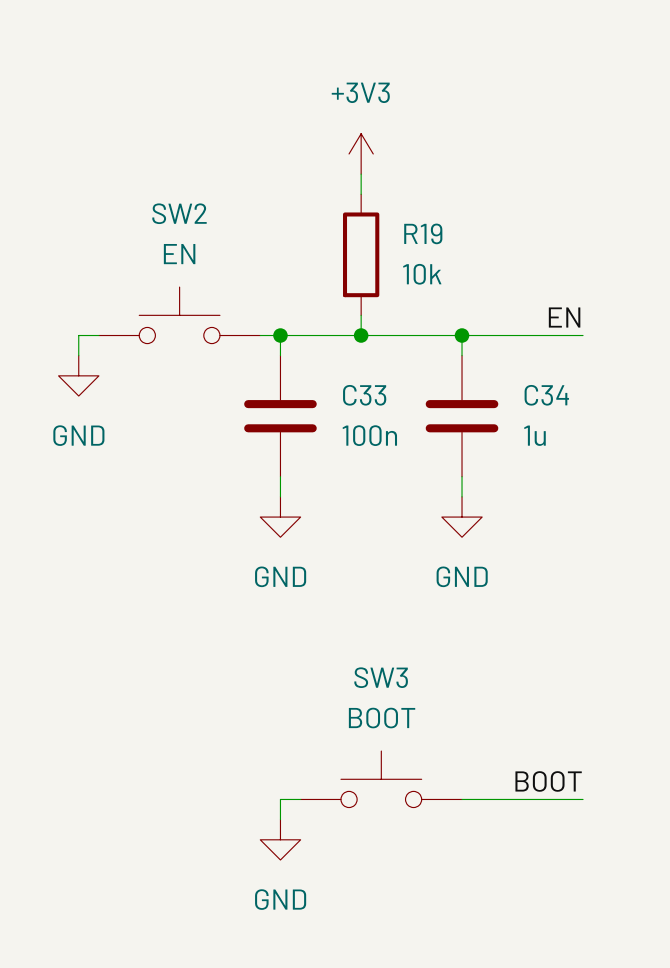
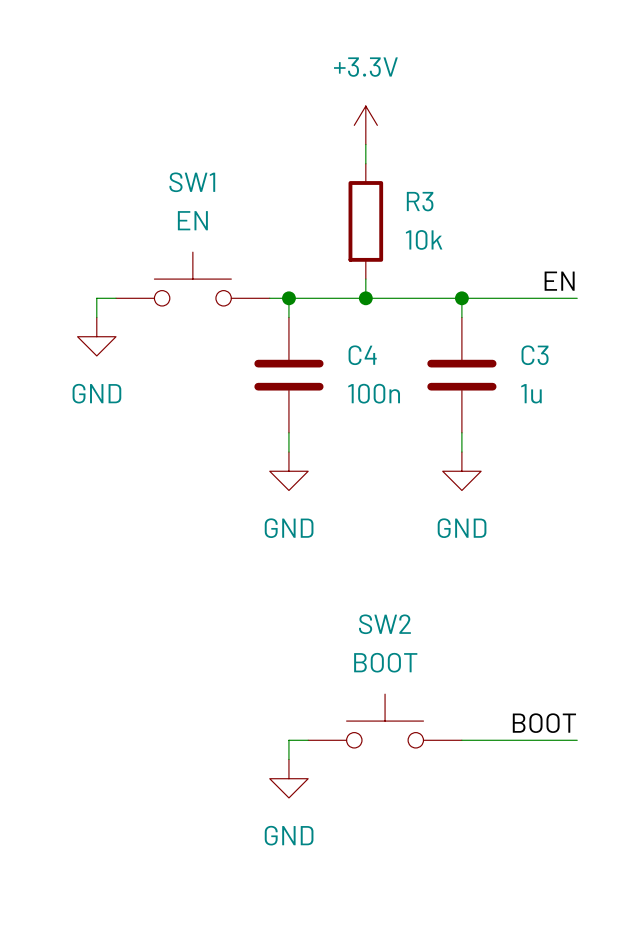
power symbol: +3V3 (361, 153) -> +3.3V (365, 125)
SW2 name: SW2 (179, 213) -> SW1 (192, 182)
R19 name: R19 (423, 233) -> R3 (420, 201)
C33 name: C33 (364, 395) -> C4 (362, 355)
C34 name: C34 (546, 395) -> C3 (535, 355)
SW3 name: SW3 (381, 677) -> SW2 (384, 624)

